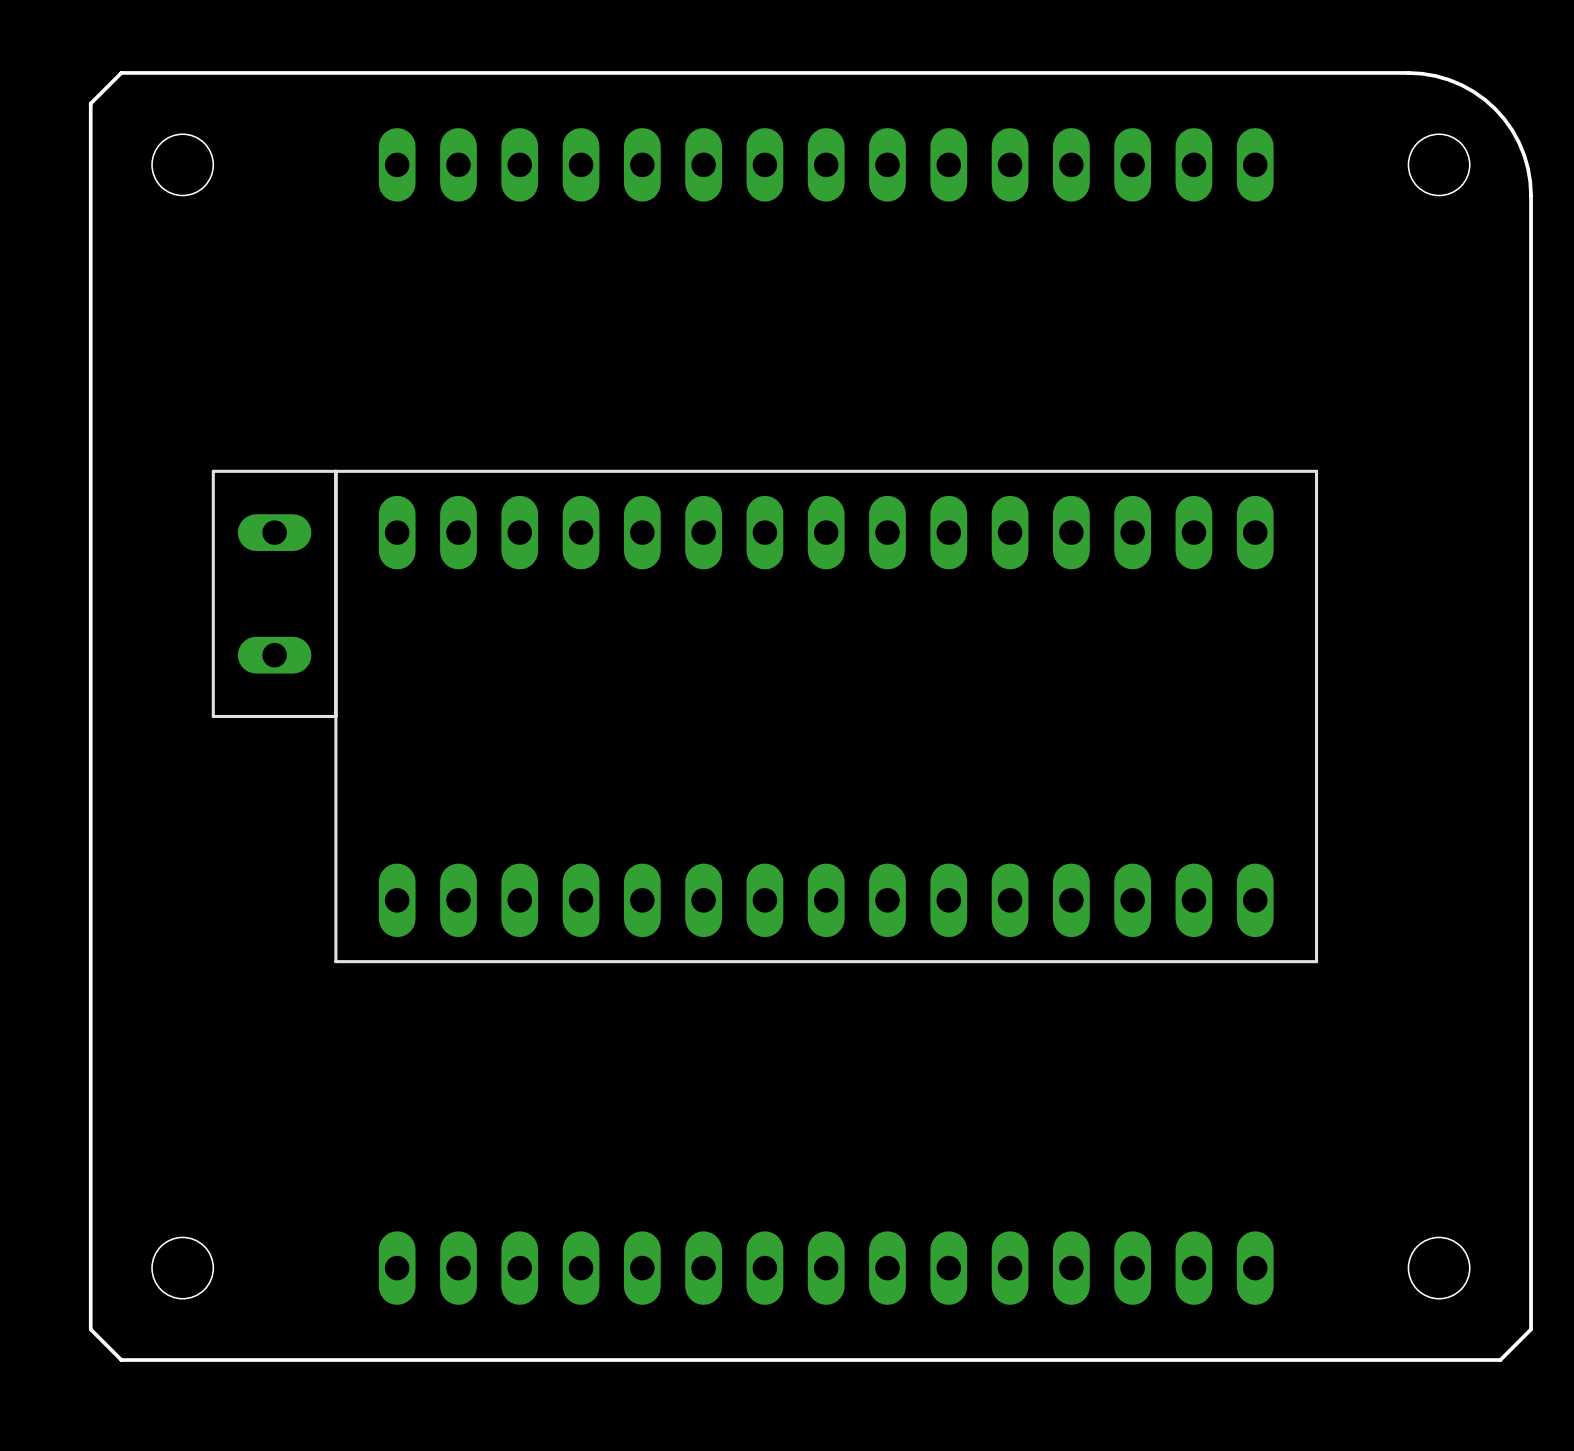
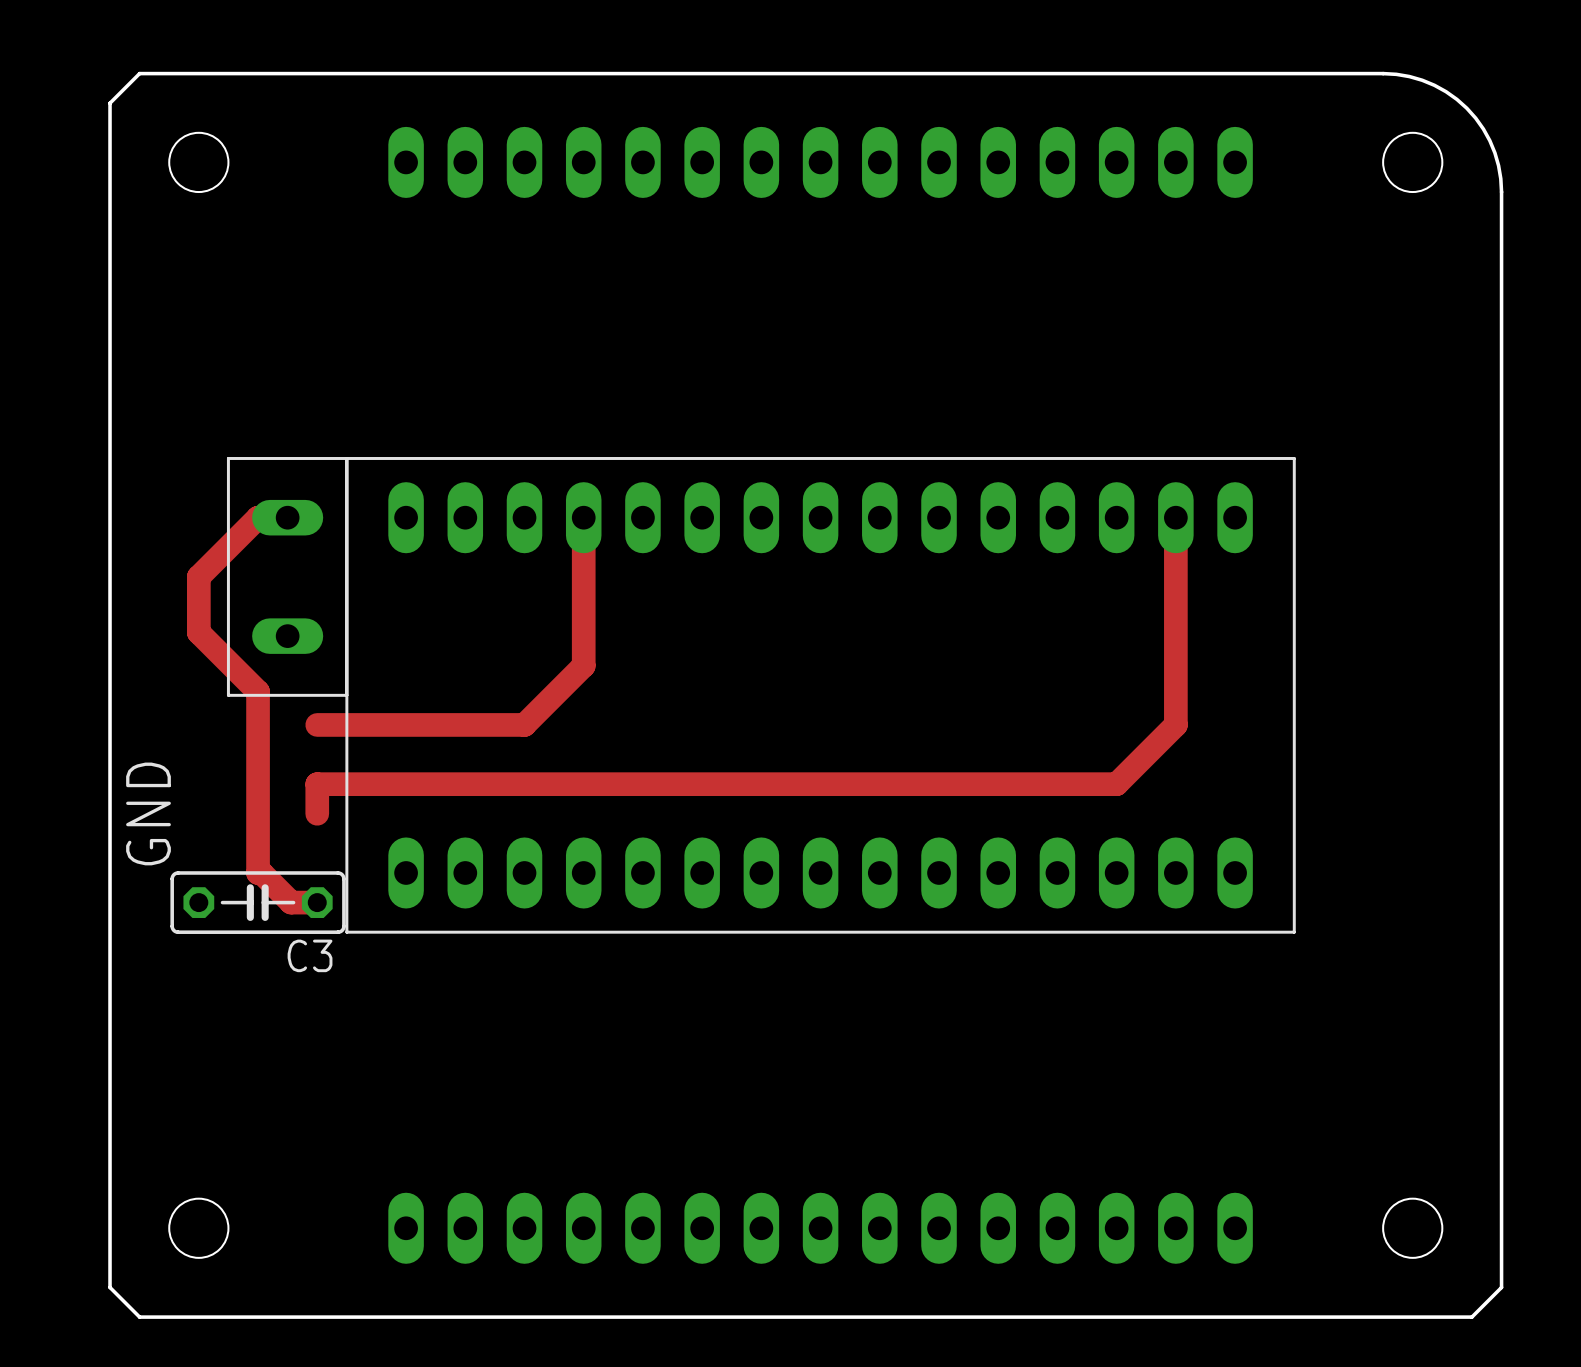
track: none -> (287, 517) (258, 517) (198, 576) (198, 632) (258, 691) (258, 872) (261, 872) (291, 902) (317, 902)
track: none -> (583, 517) (583, 665) (524, 724) (317, 724)
track: none -> (1175, 517) (1175, 724) (1116, 784) (317, 784) (317, 813)
text: none -> GND (148, 813)
C3: none -> (258, 902)

